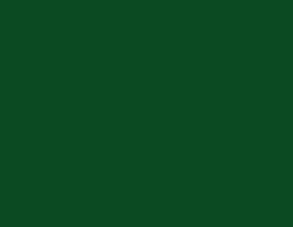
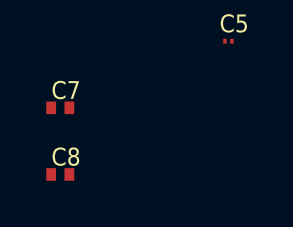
C5: none -> (228, 41)
C7: none -> (60, 107)
C8: none -> (60, 174)

